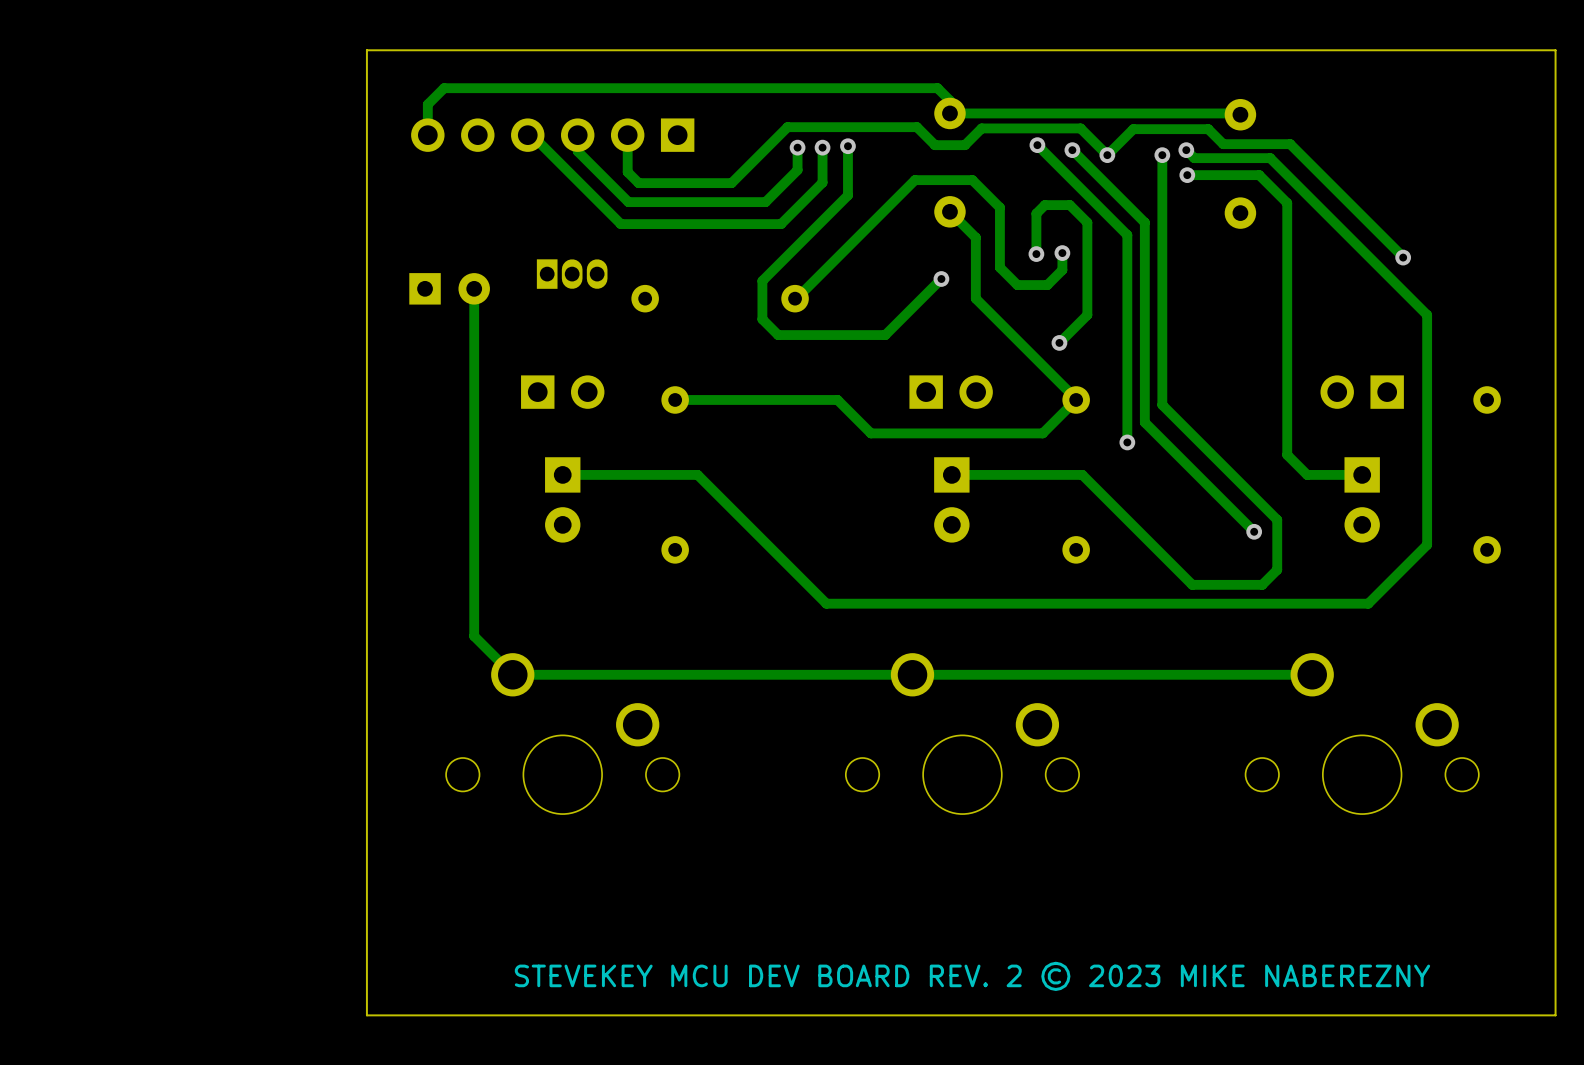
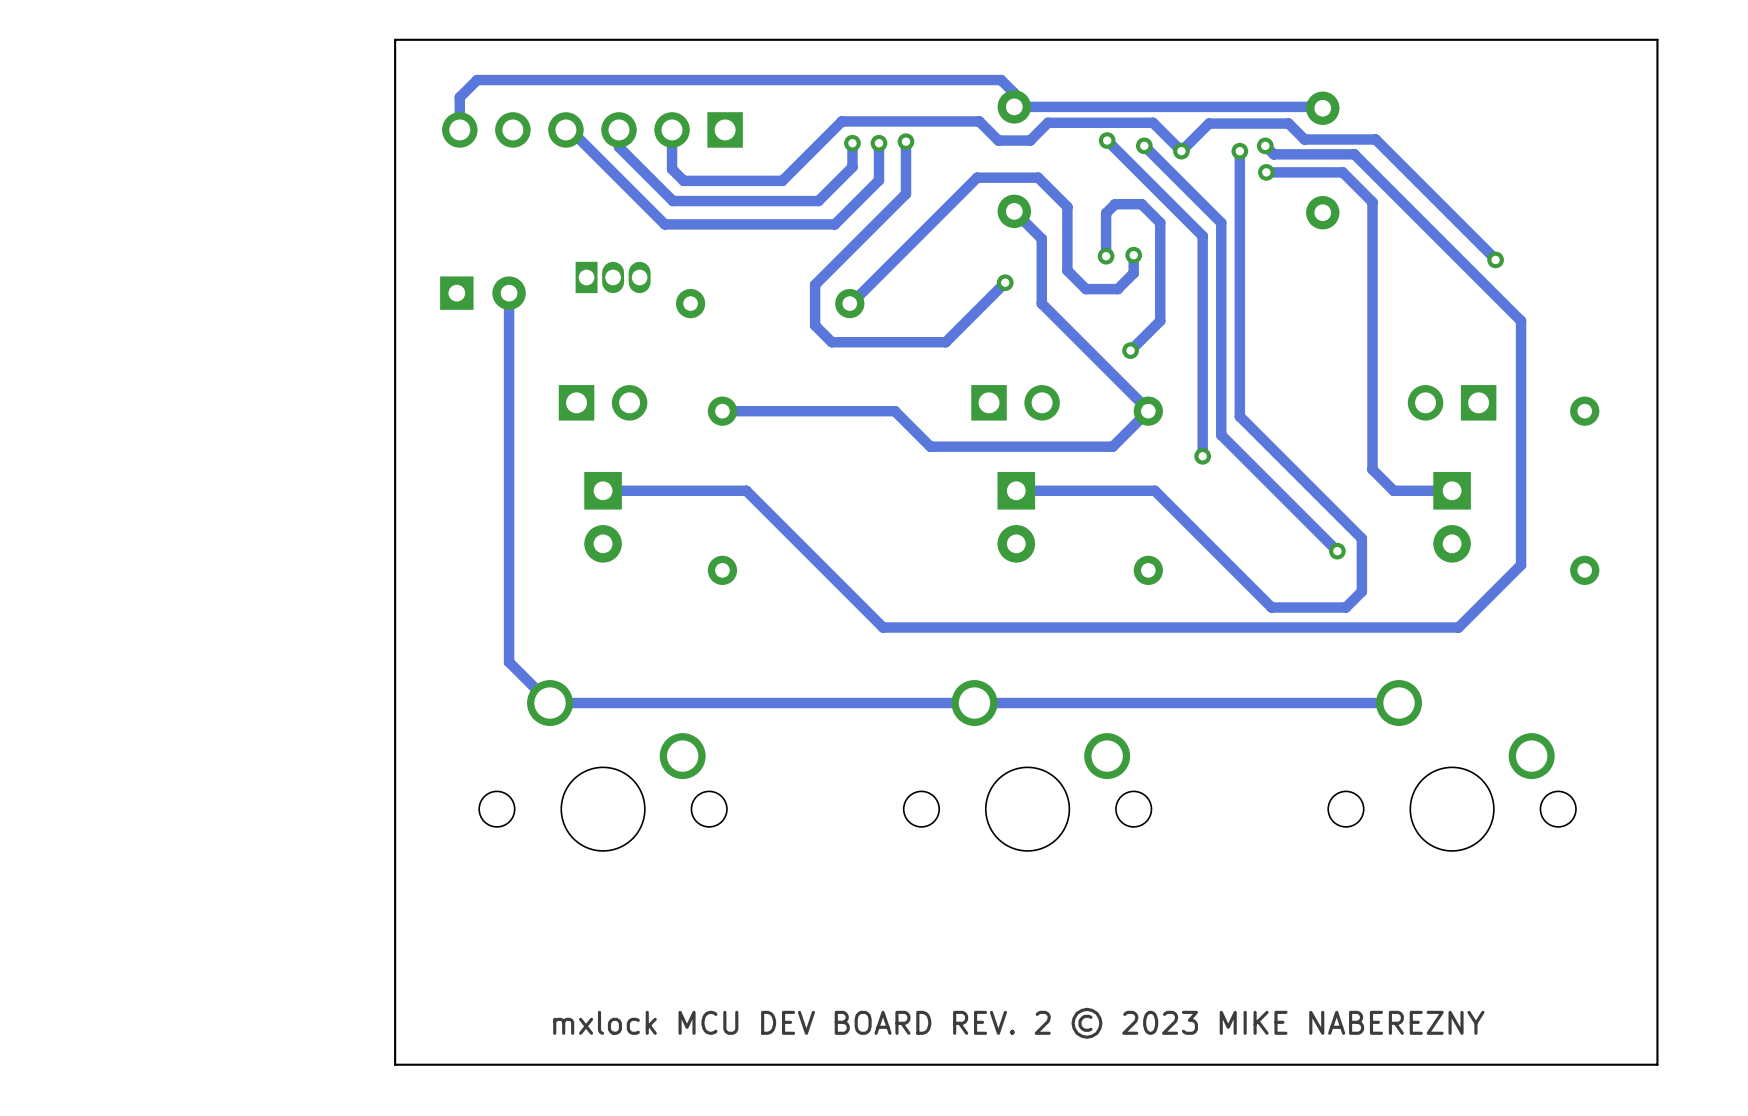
text: STEVEKEY MCU DEV BOARD REV. 2 © 2023 MIKE NABEREZNY (972, 976) -> mxlock MCU DEV BOARD REV. 2 © 2023 MIKE NABEREZNY (1018, 1023)

